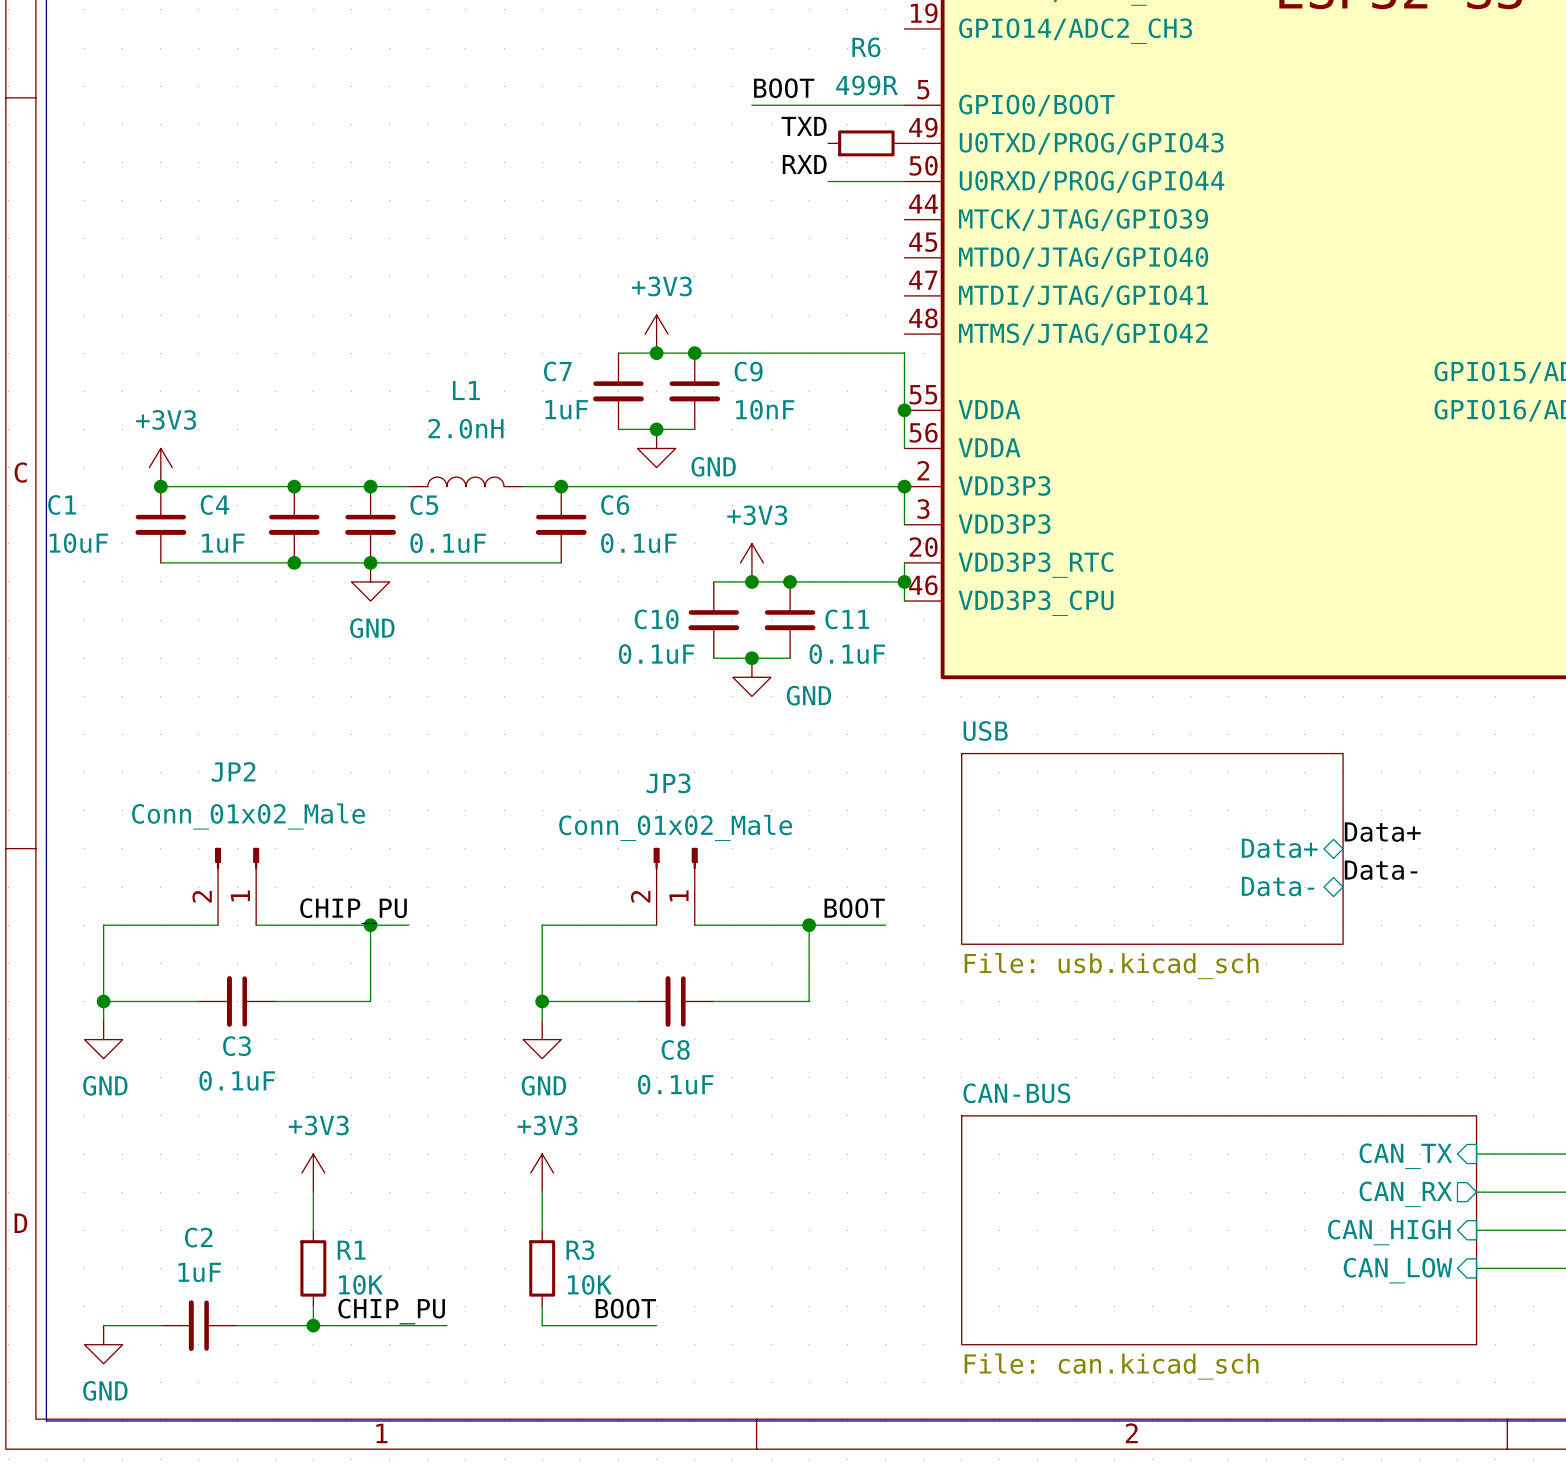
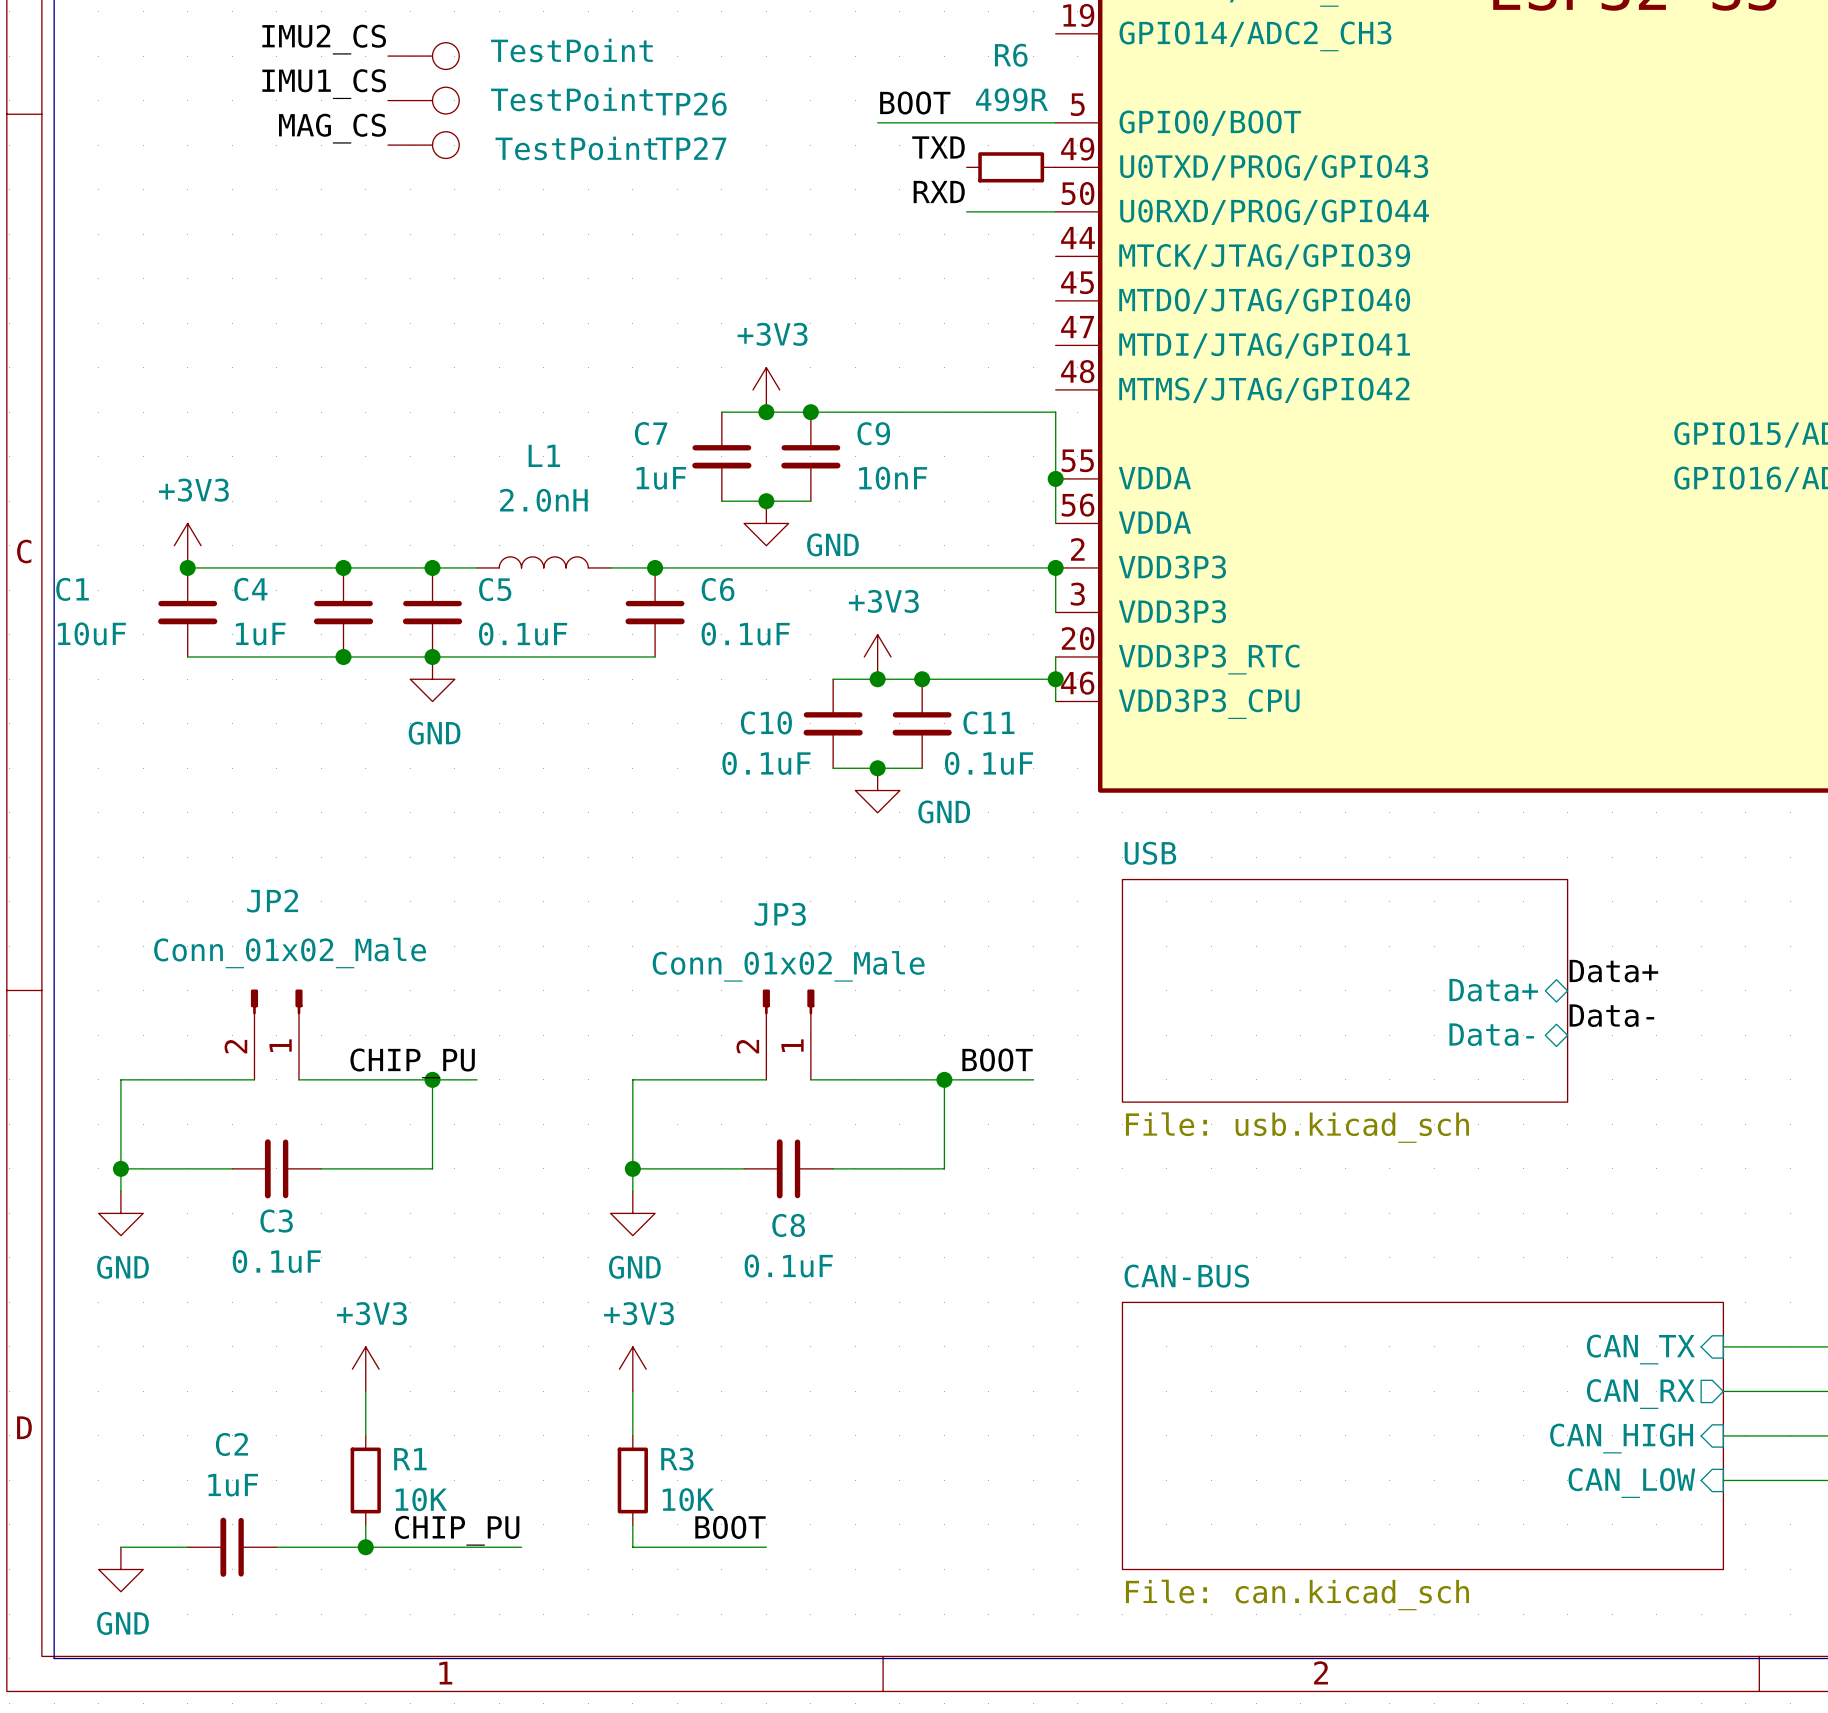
label: none -> IMU2_CS (324, 39)
part: none -> TestPoint (423, 56)
label: none -> IMU1_CS (324, 84)
TP26: none -> TestPoint (423, 100)
label: none -> MAG_CS (332, 128)
TP27: none -> TestPoint (423, 145)

